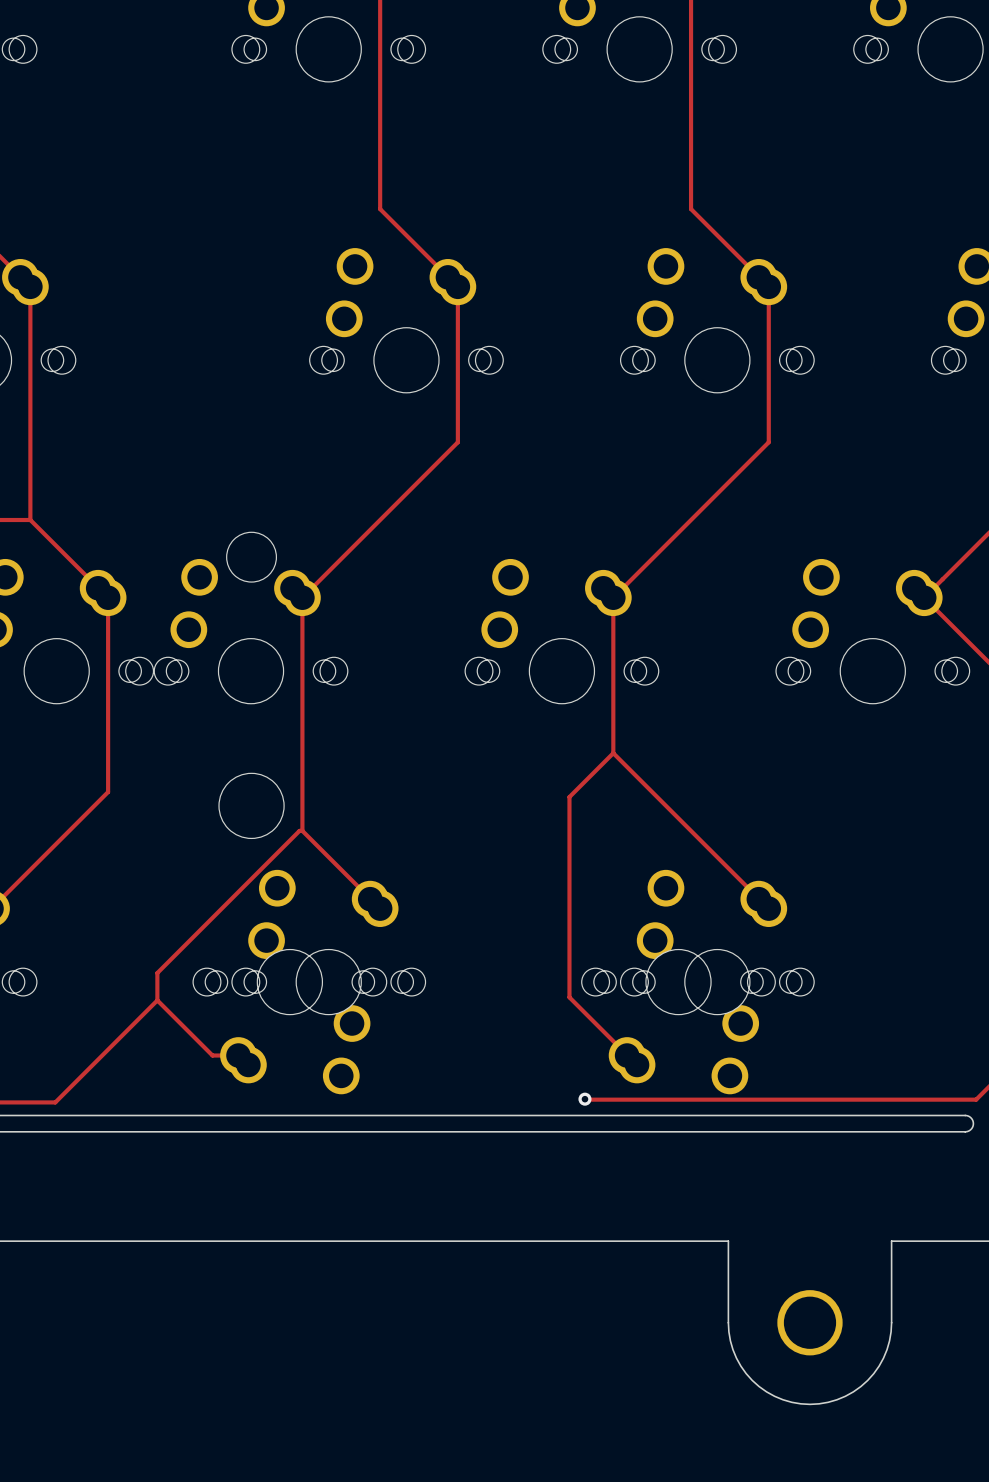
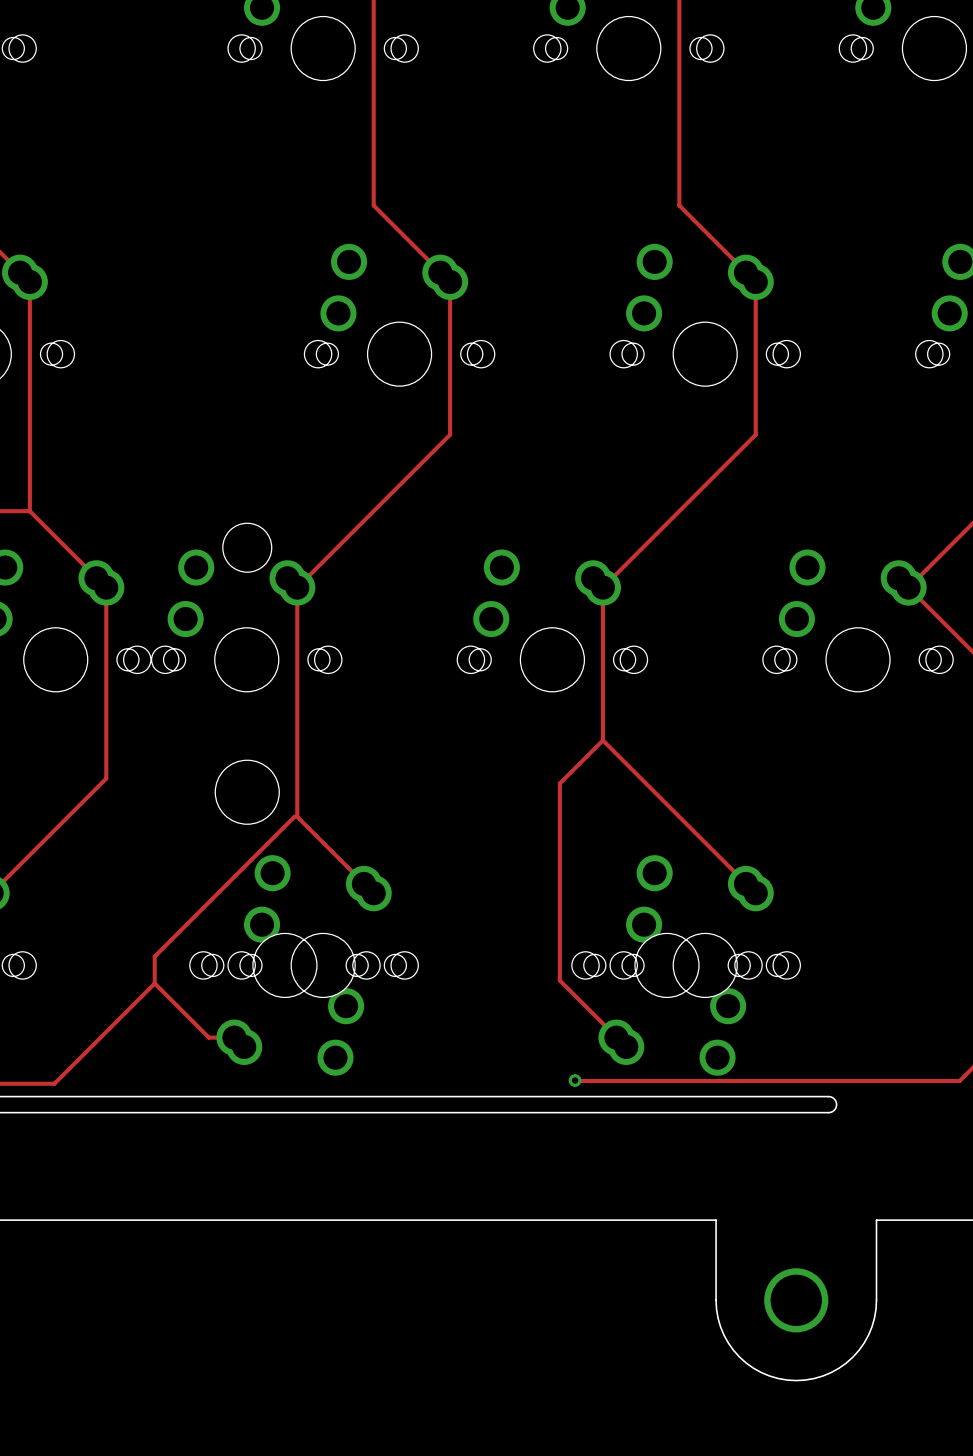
board edge: (842, 1115) (965, 1115) (971, 1117) (973, 1123) (971, 1129) (965, 1131) (842, 1131) -> (828, 1096) (834, 1098) (836, 1104) (834, 1110) (828, 1112)

